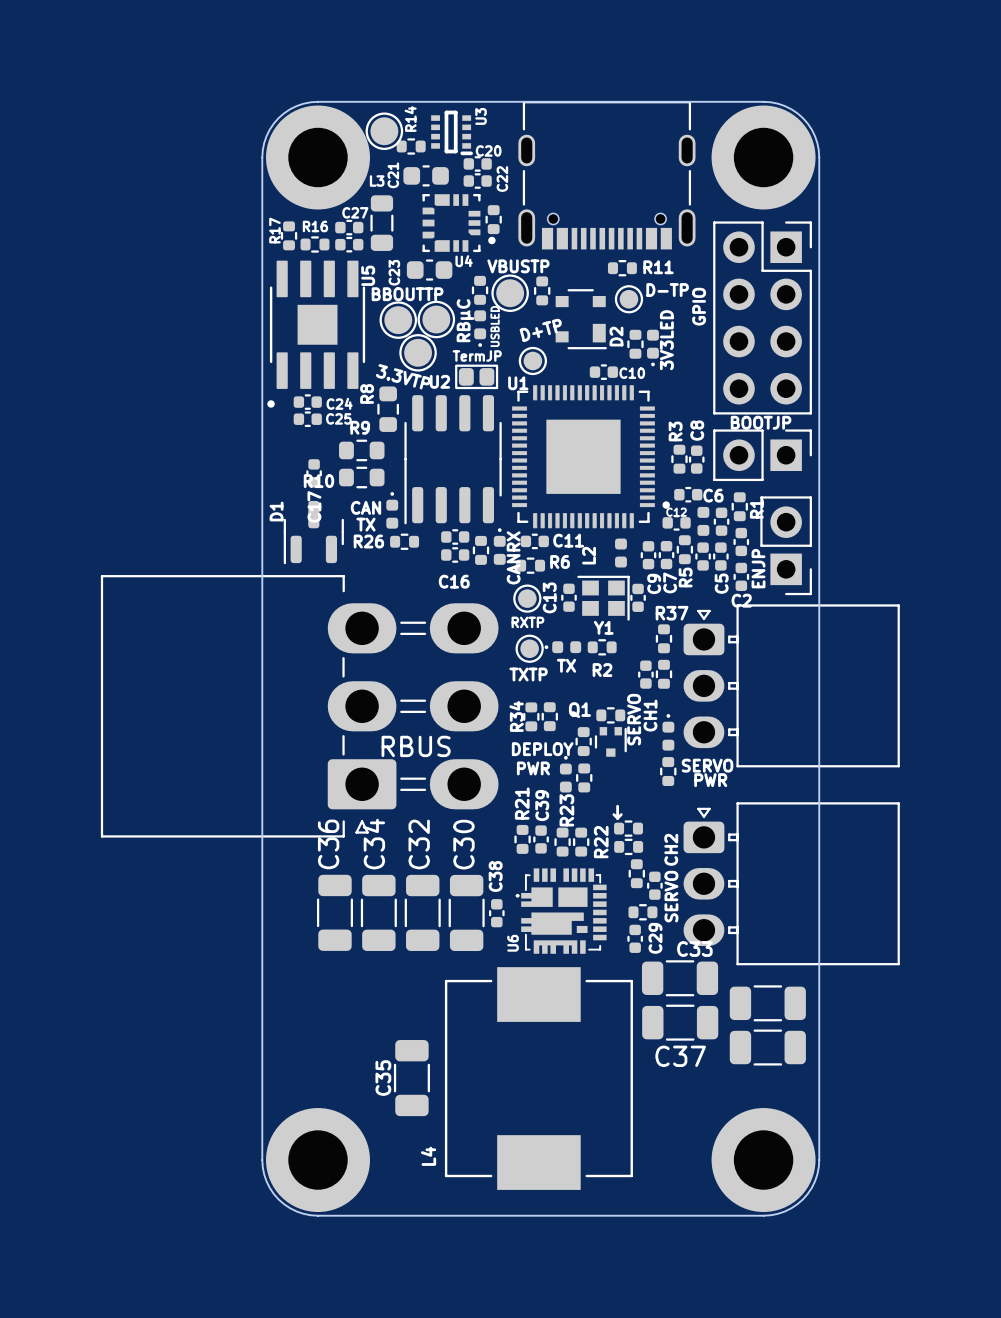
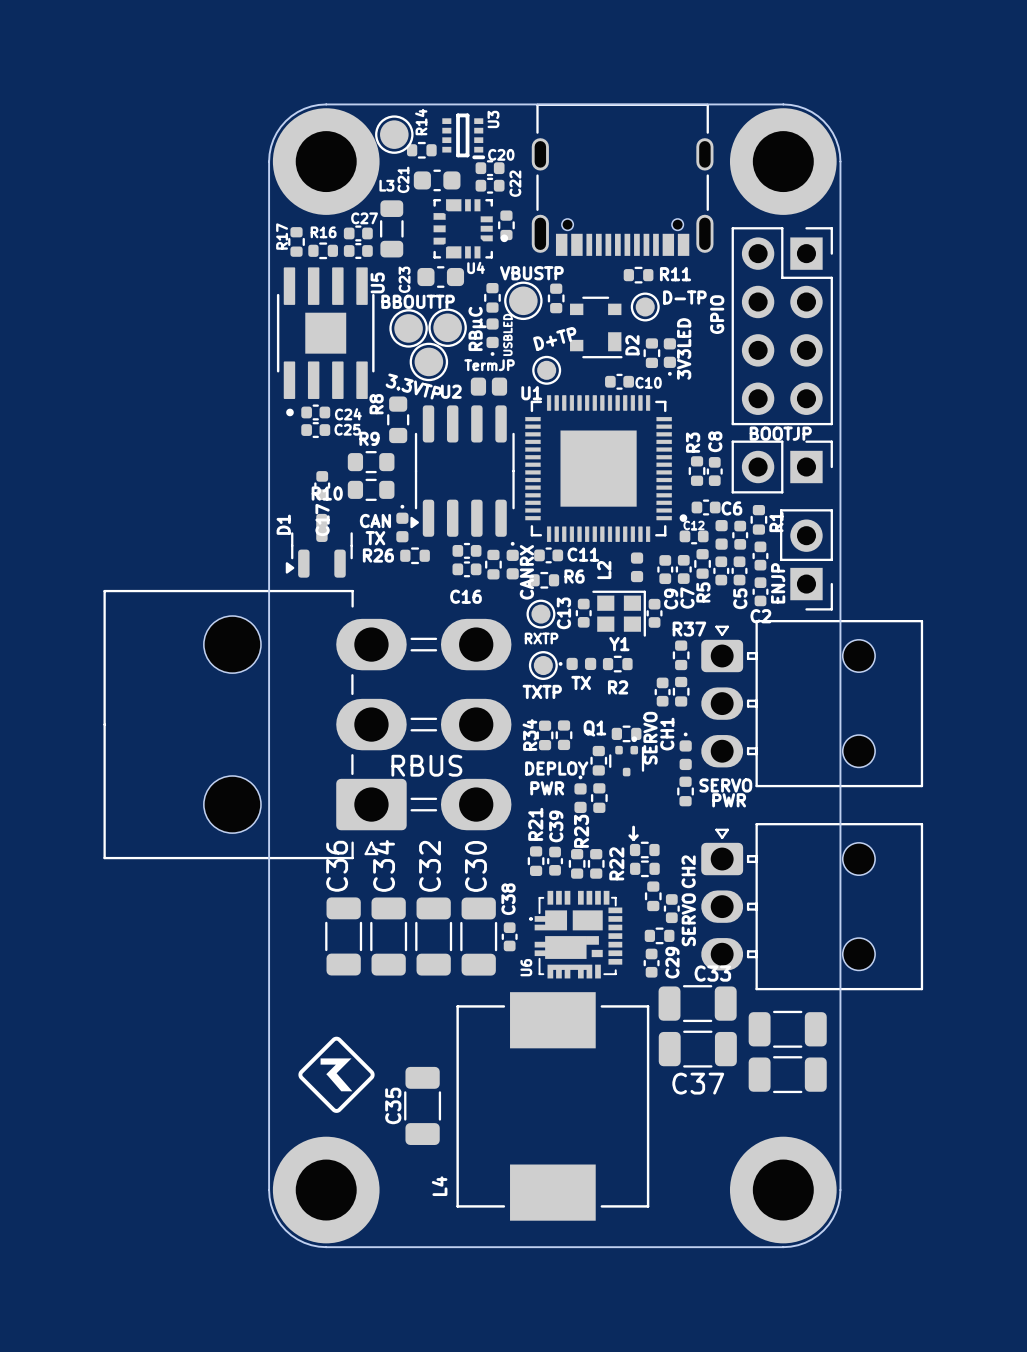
U4 footprint: [422, 194, 496, 253] -> [433, 199, 509, 259]
U5 footprint: [267, 260, 366, 408] -> [276, 267, 375, 417]
part footprint: [455, 364, 499, 390] -> [470, 377, 508, 396]
U2 footprint: [404, 395, 502, 525] -> [410, 405, 515, 537]
D1 footprint: [283, 500, 344, 565] -> [285, 513, 353, 578]
part footprint: [100, 575, 499, 838] -> [103, 589, 512, 860]
part footprint: [683, 604, 900, 768] -> [701, 620, 924, 788]
Q1 footprint: [594, 727, 627, 757] -> [609, 736, 645, 777]
part footprint: [683, 802, 900, 966] -> [701, 823, 924, 991]
drawing: none -> [298, 1036, 375, 1113]

